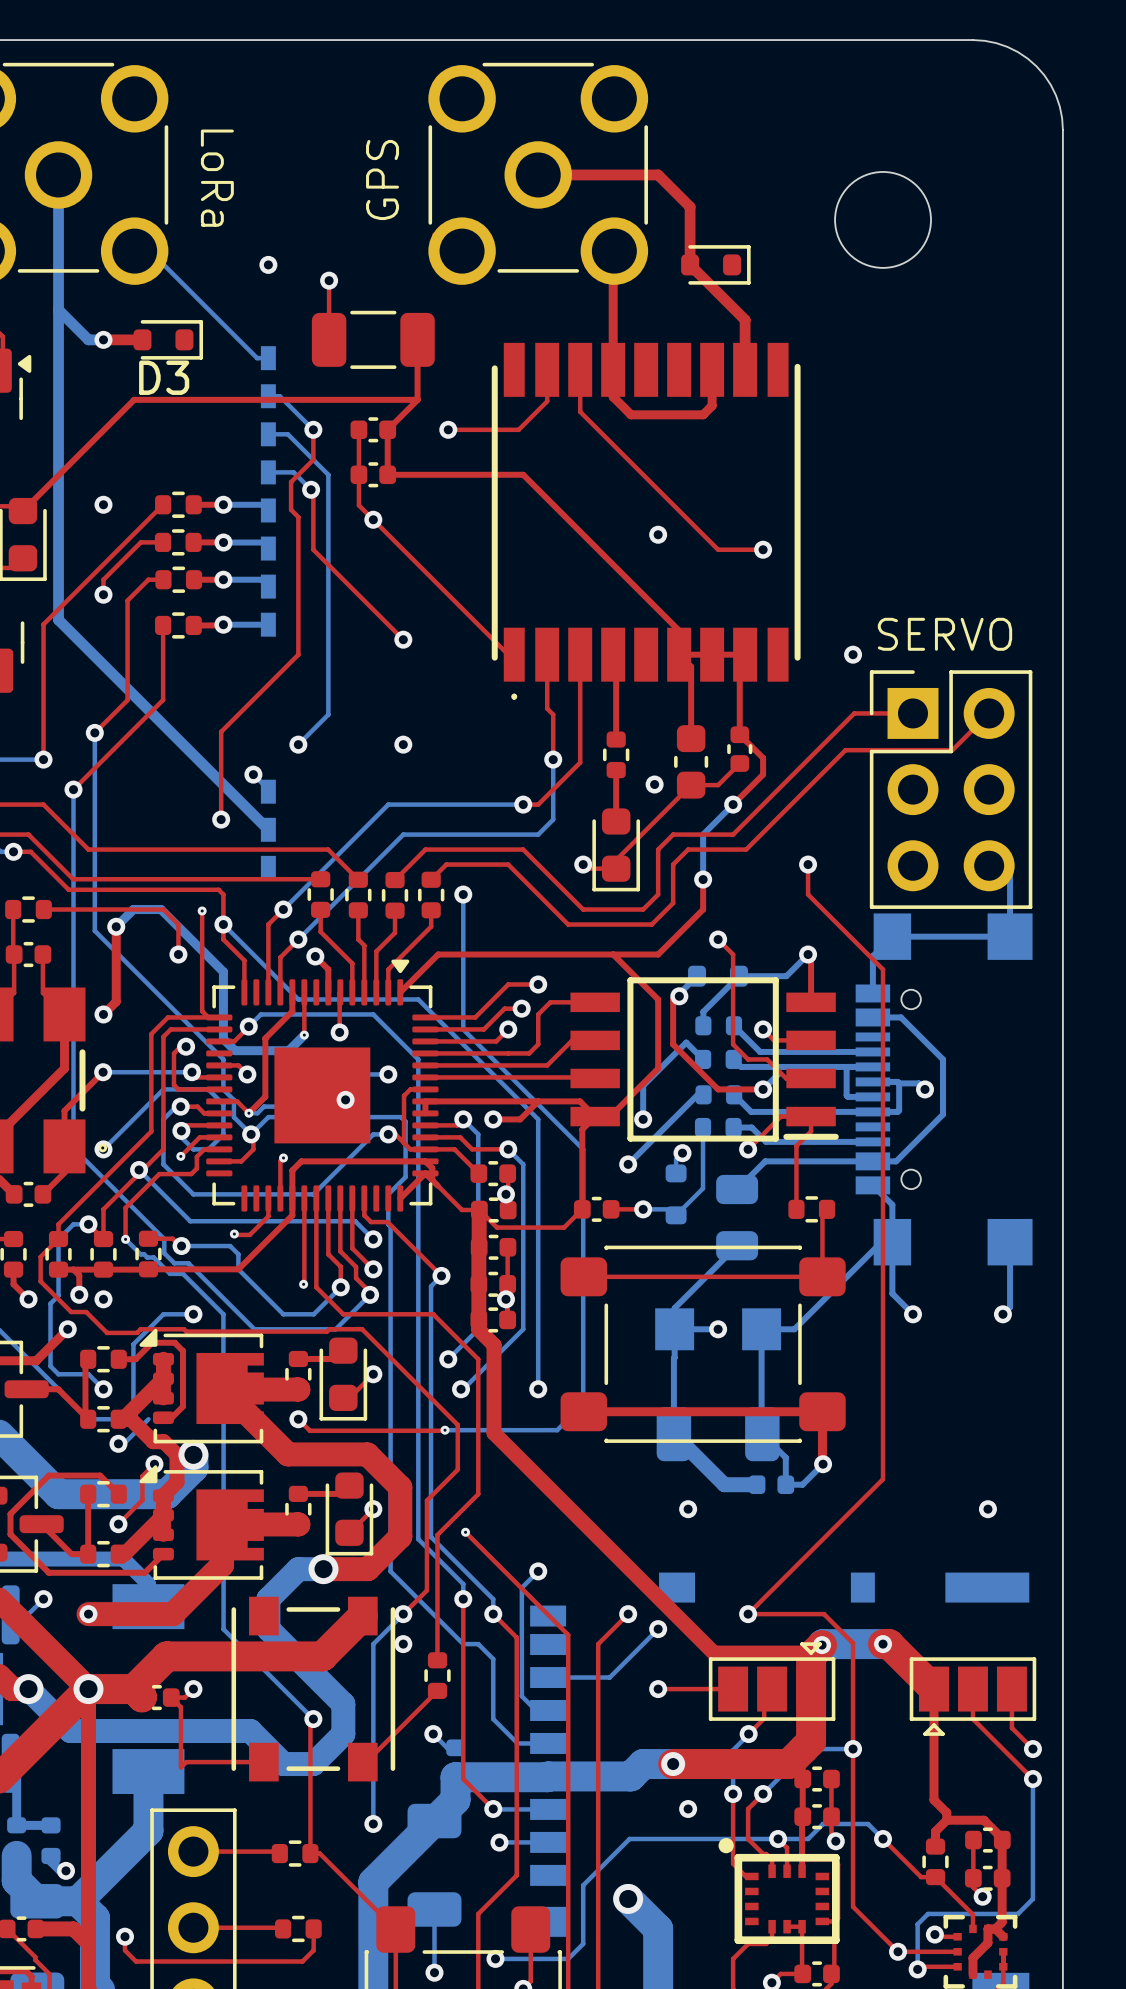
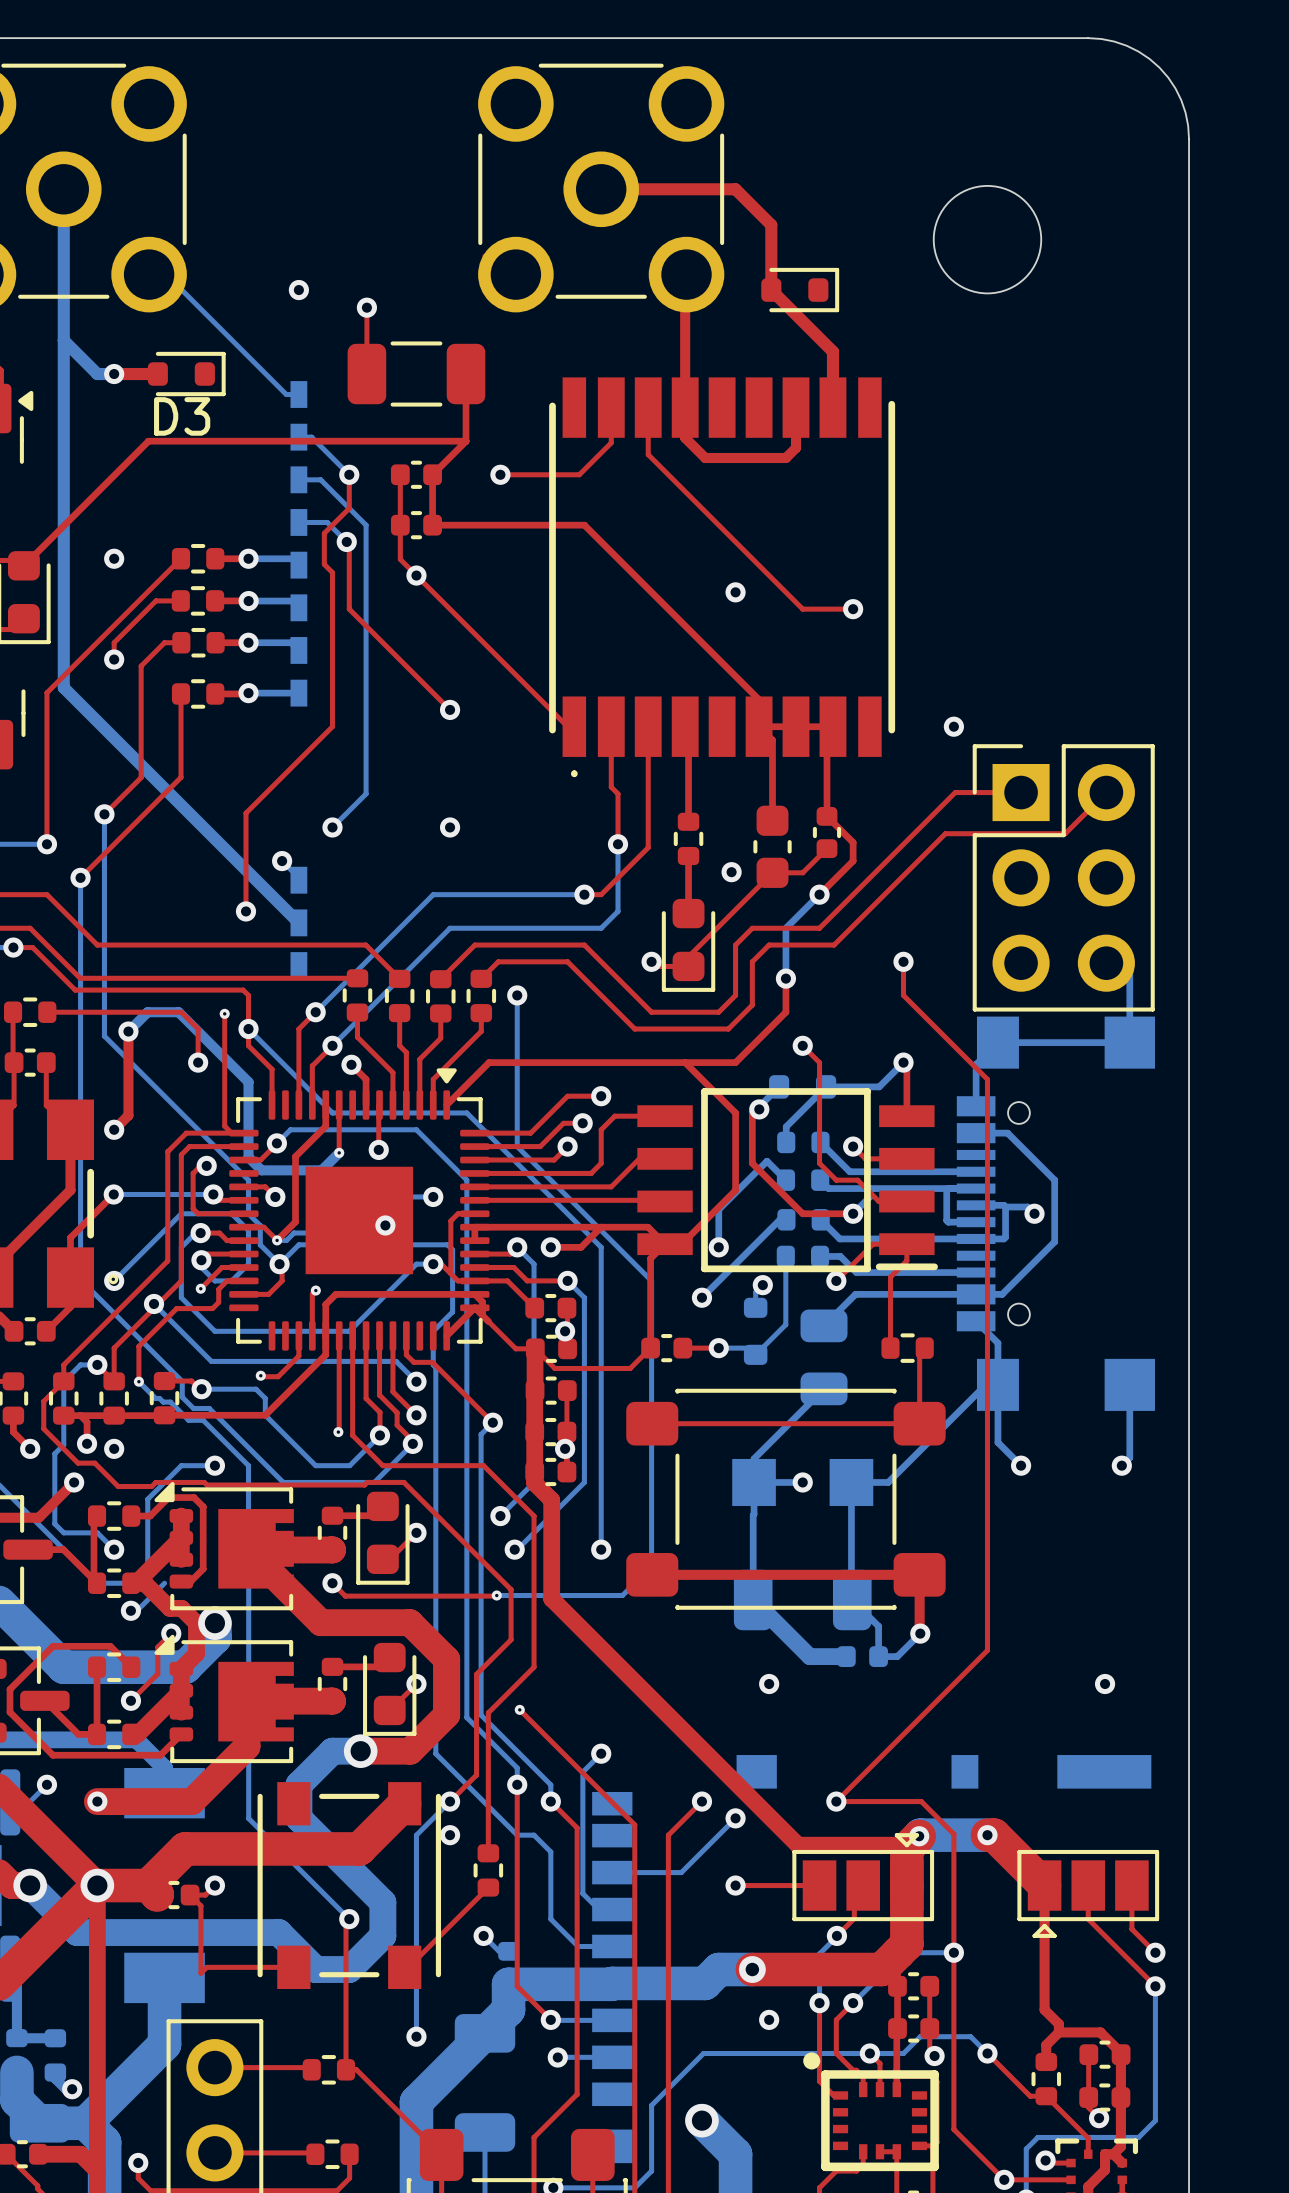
text: LoRa (217, 178) -> none
text: GPS (382, 180) -> none
text: SERVO (944, 634) -> none

